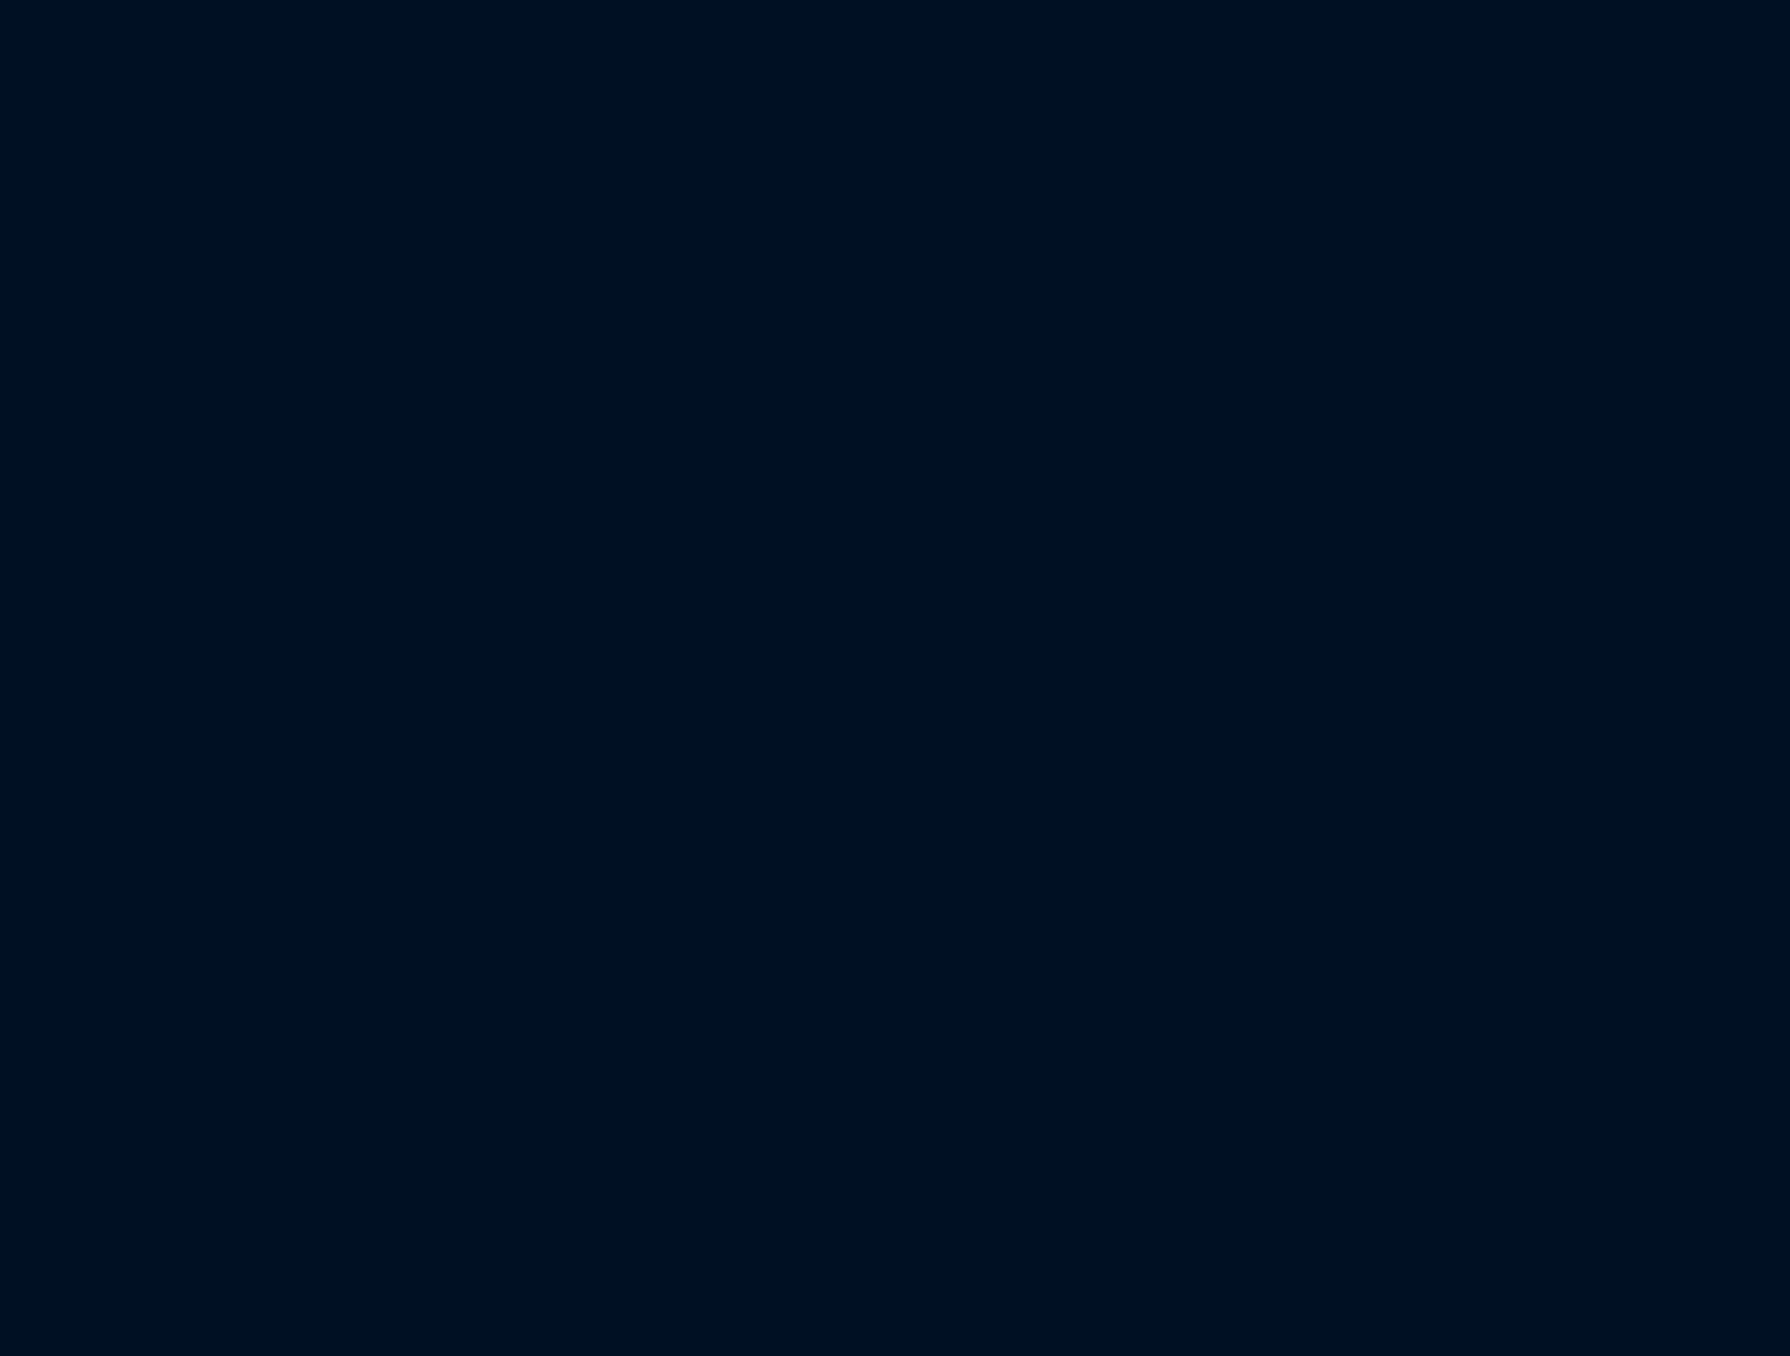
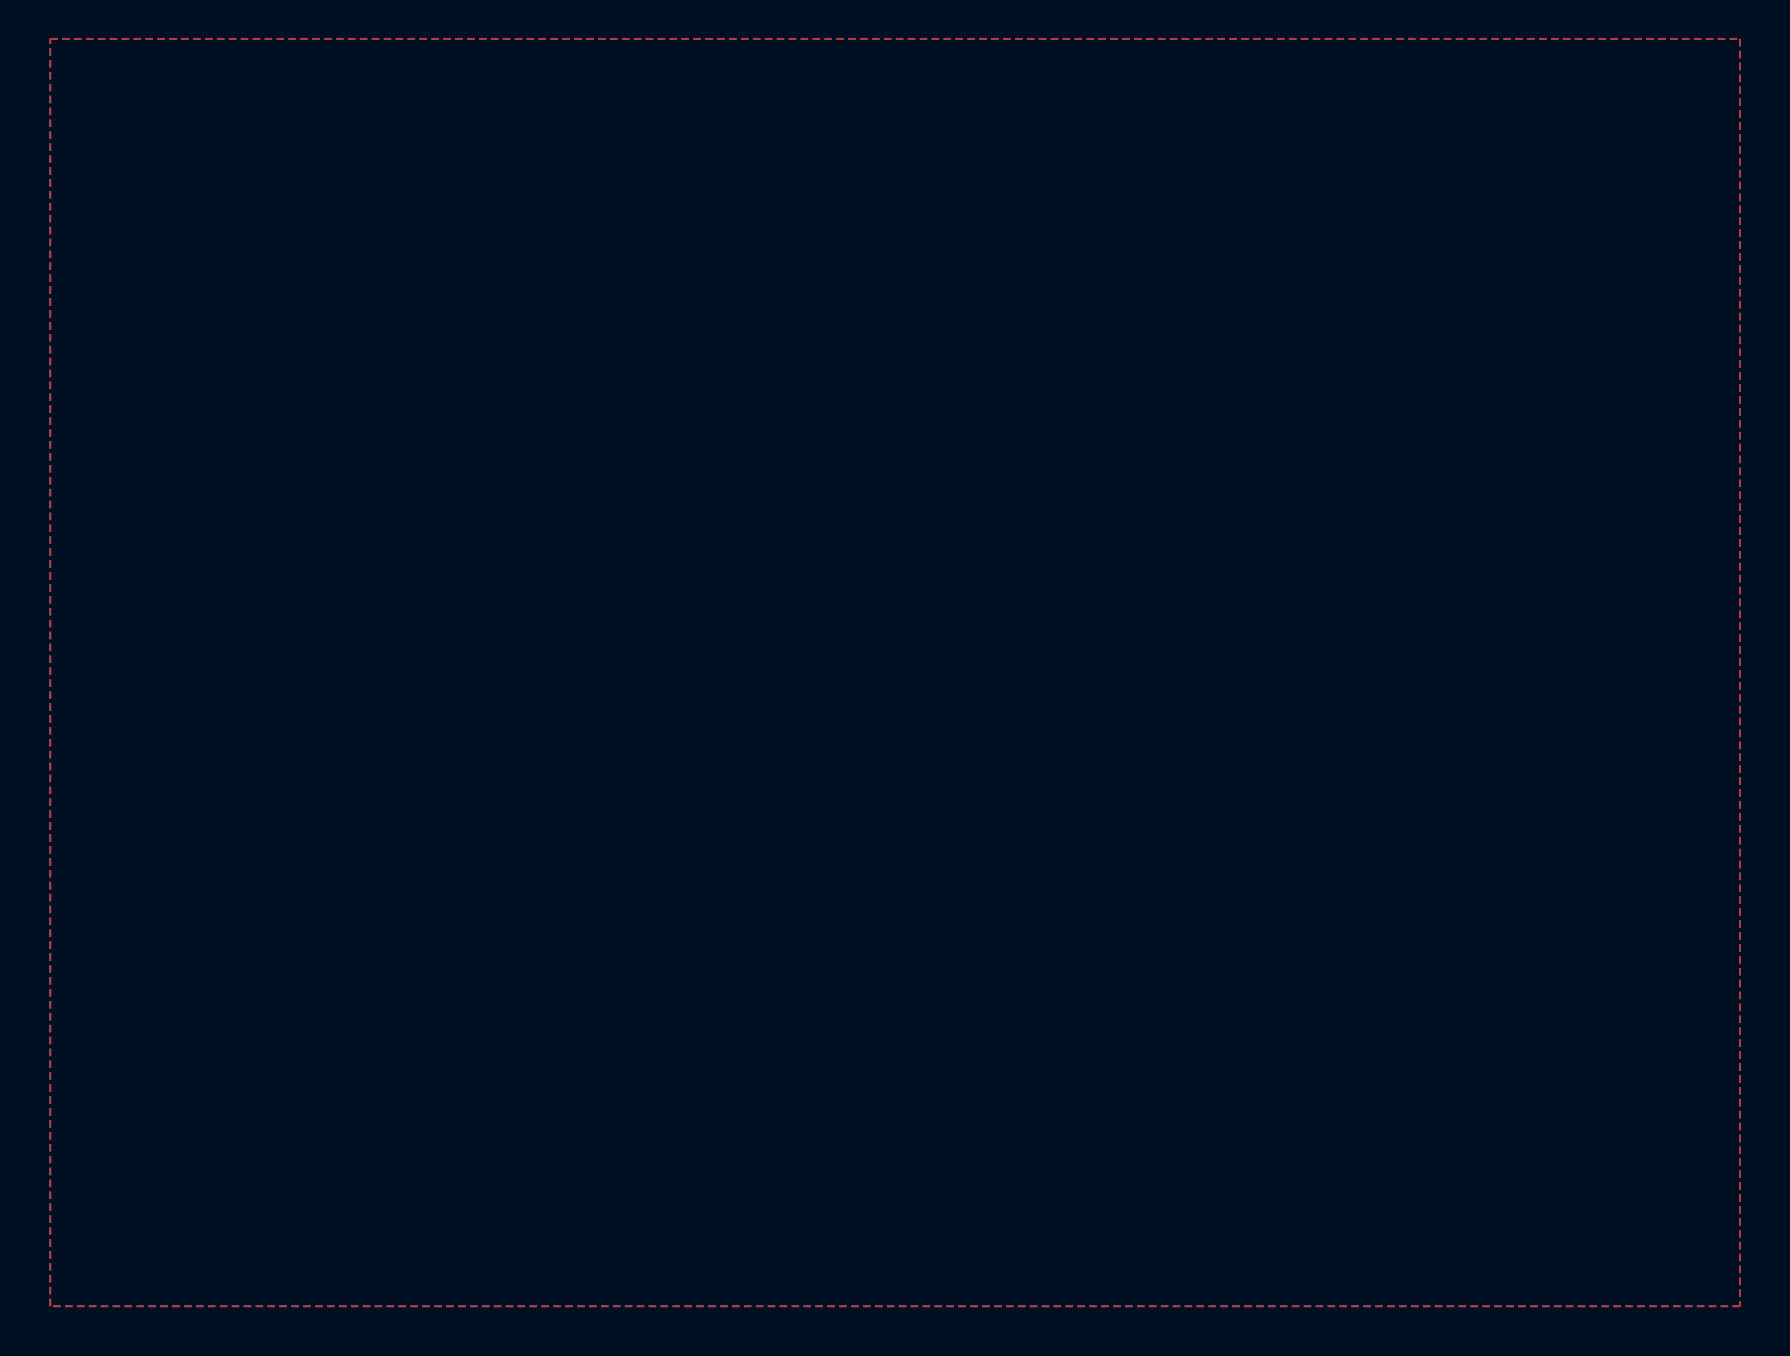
top zone outline: none -> (50, 38) (1740, 38) (1740, 1306) (50, 1306) (50, 38)

